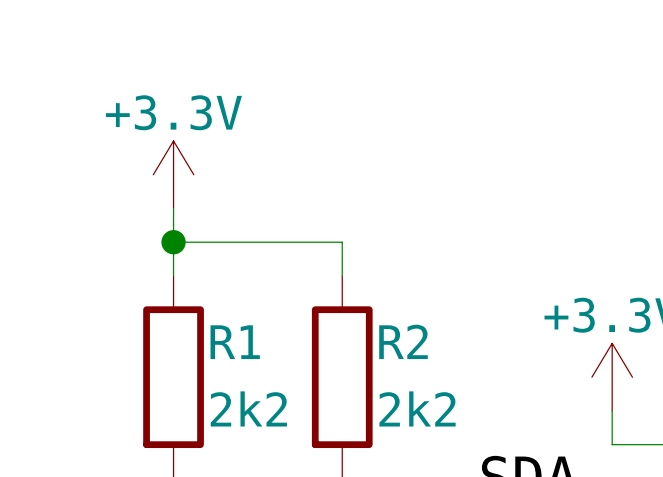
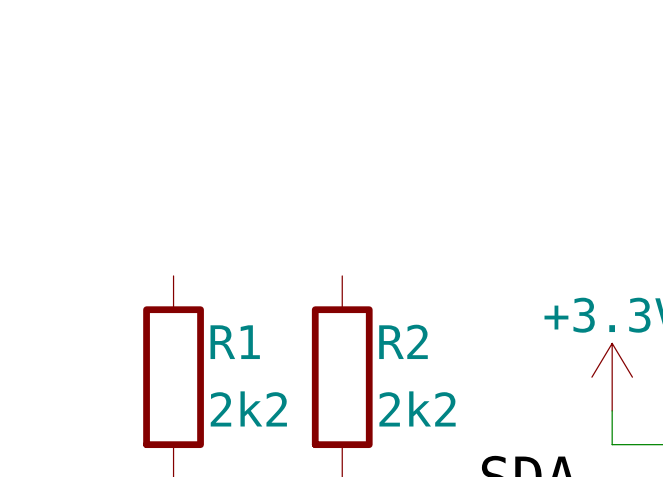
power symbol: +3.3V (173, 174) -> none
wire: (173, 208) (173, 275) -> none
wire: (173, 242) (342, 242) (342, 275) -> none
junction: (173, 242) -> none

